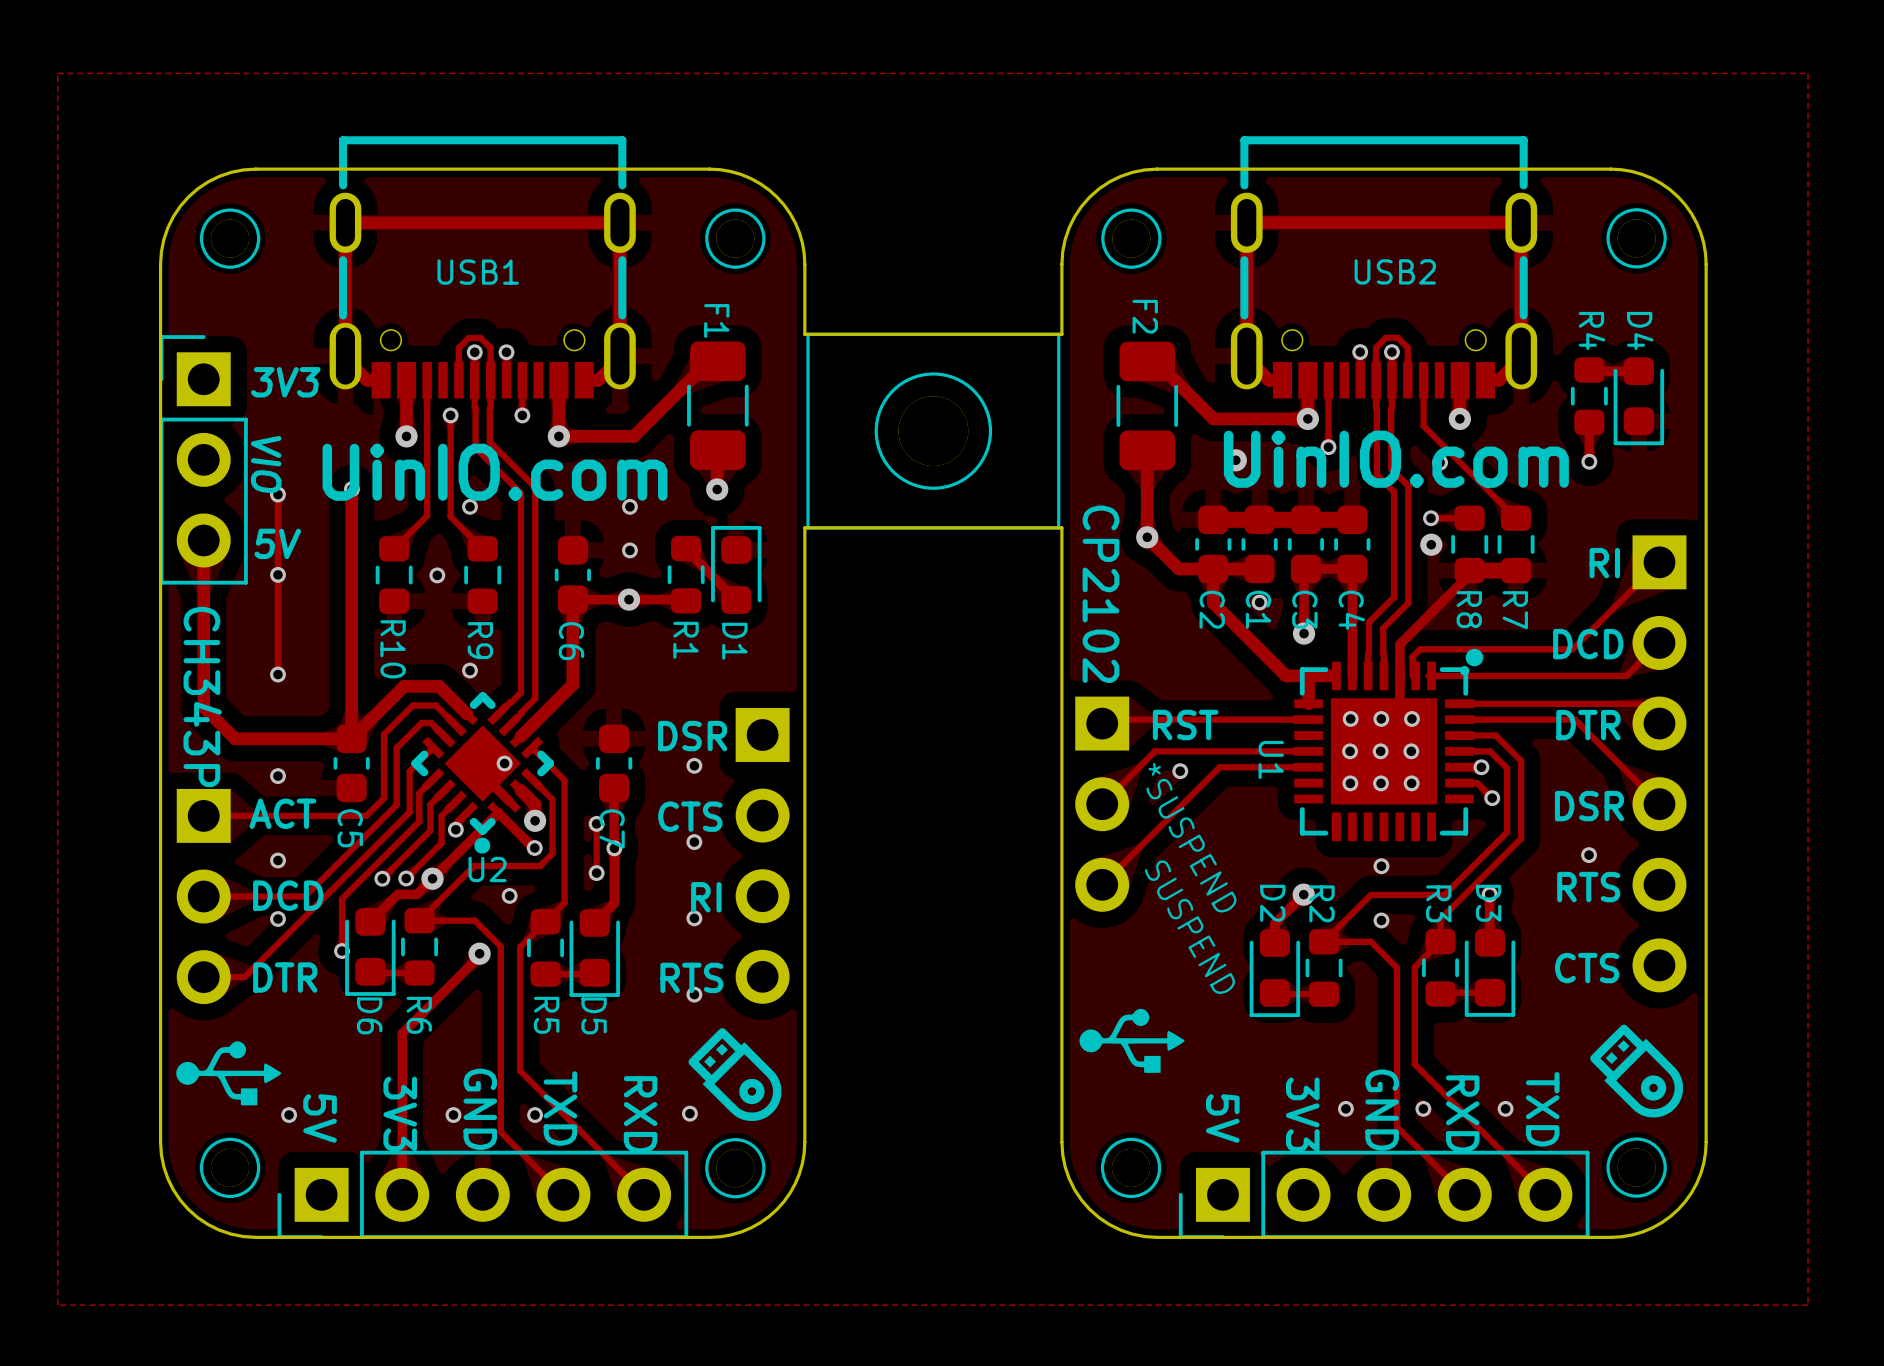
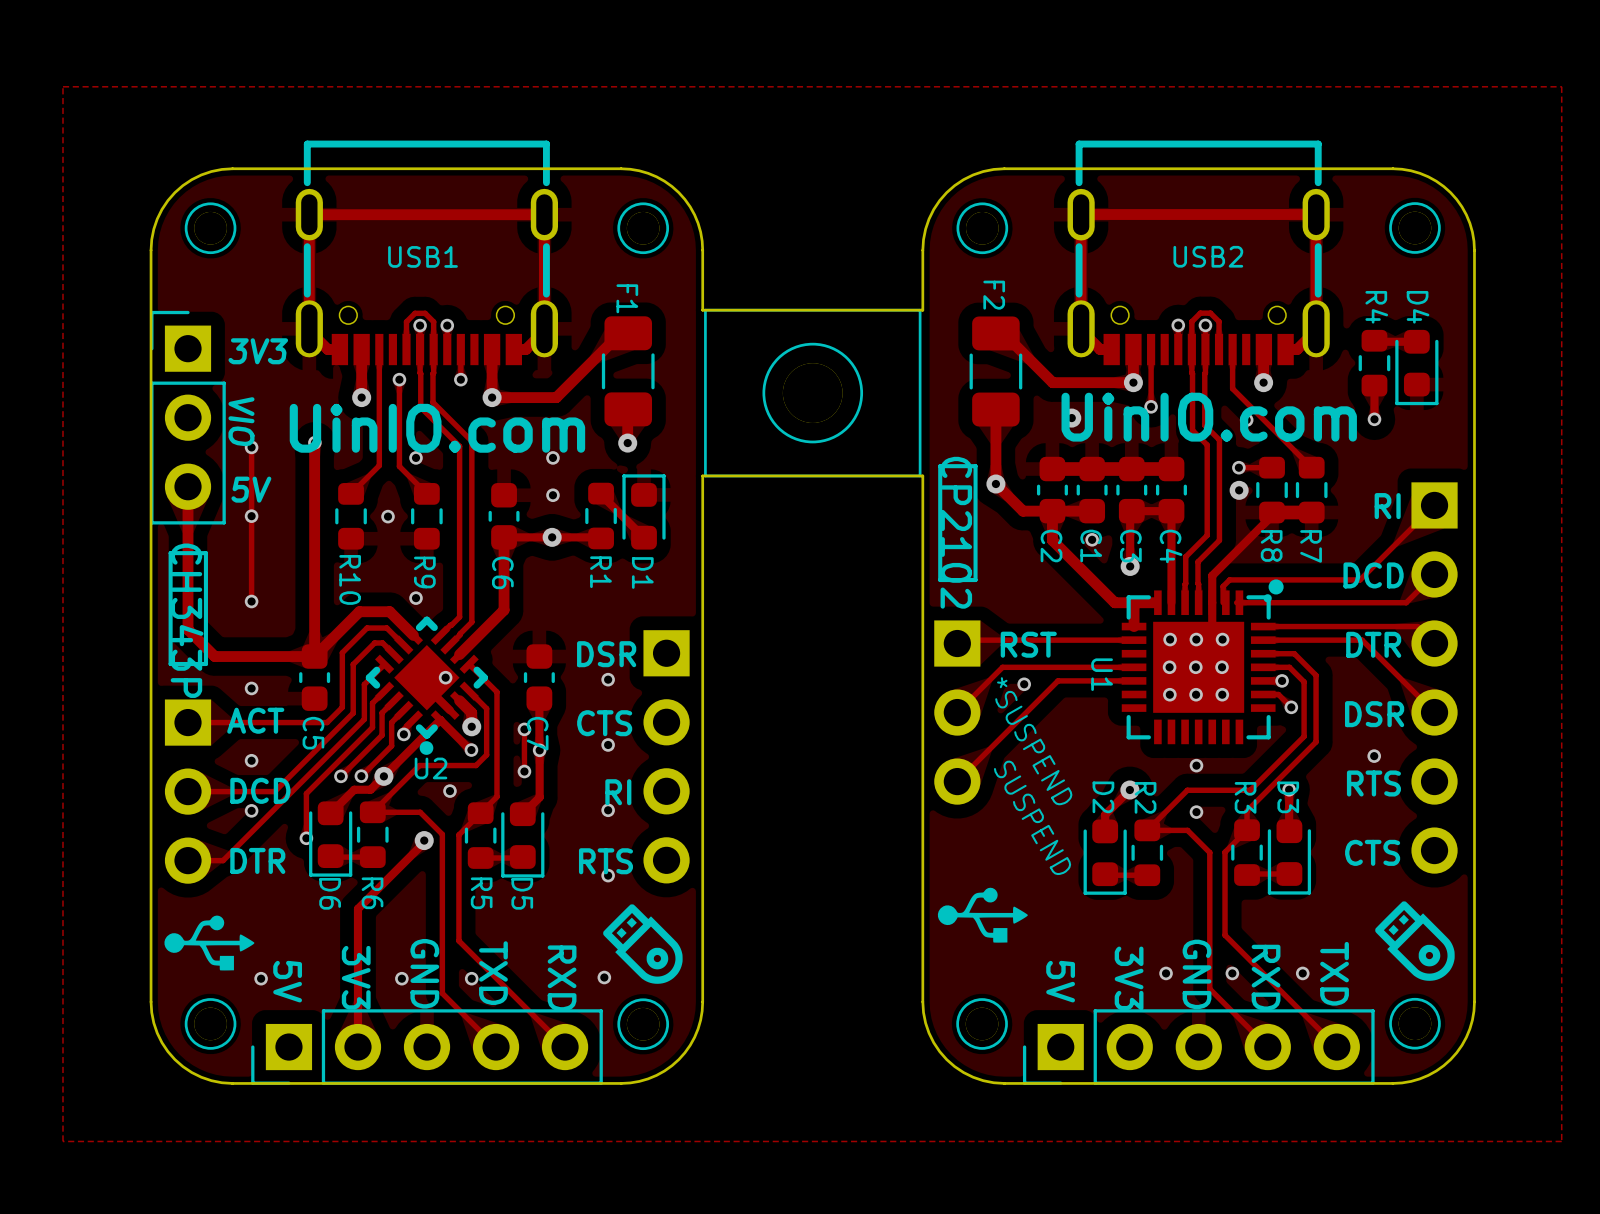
line: none -> (940, 466) (975, 466) (975, 580) (940, 580) (940, 466)
line: none -> (170, 553) (205, 553) (205, 664) (170, 664) (170, 553)

